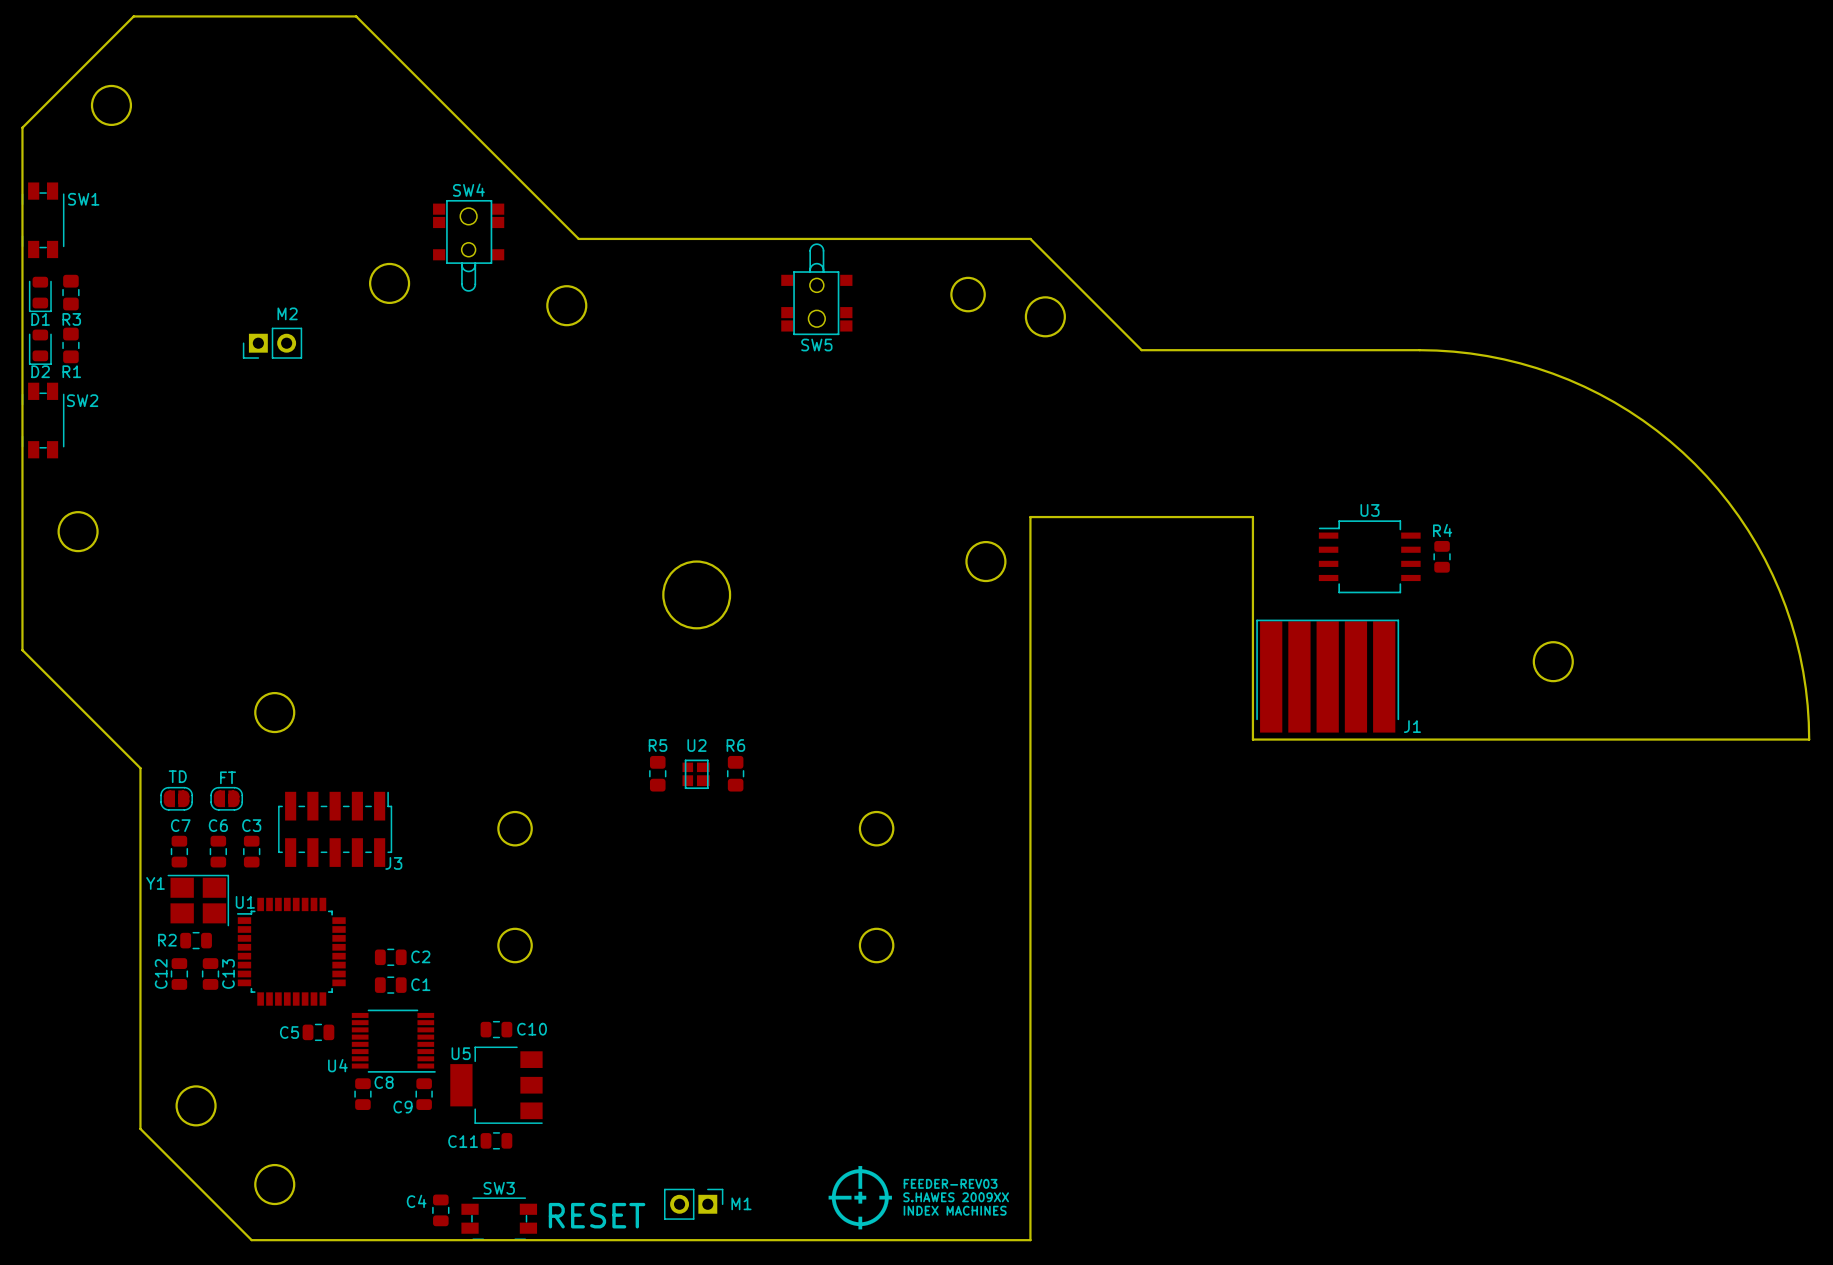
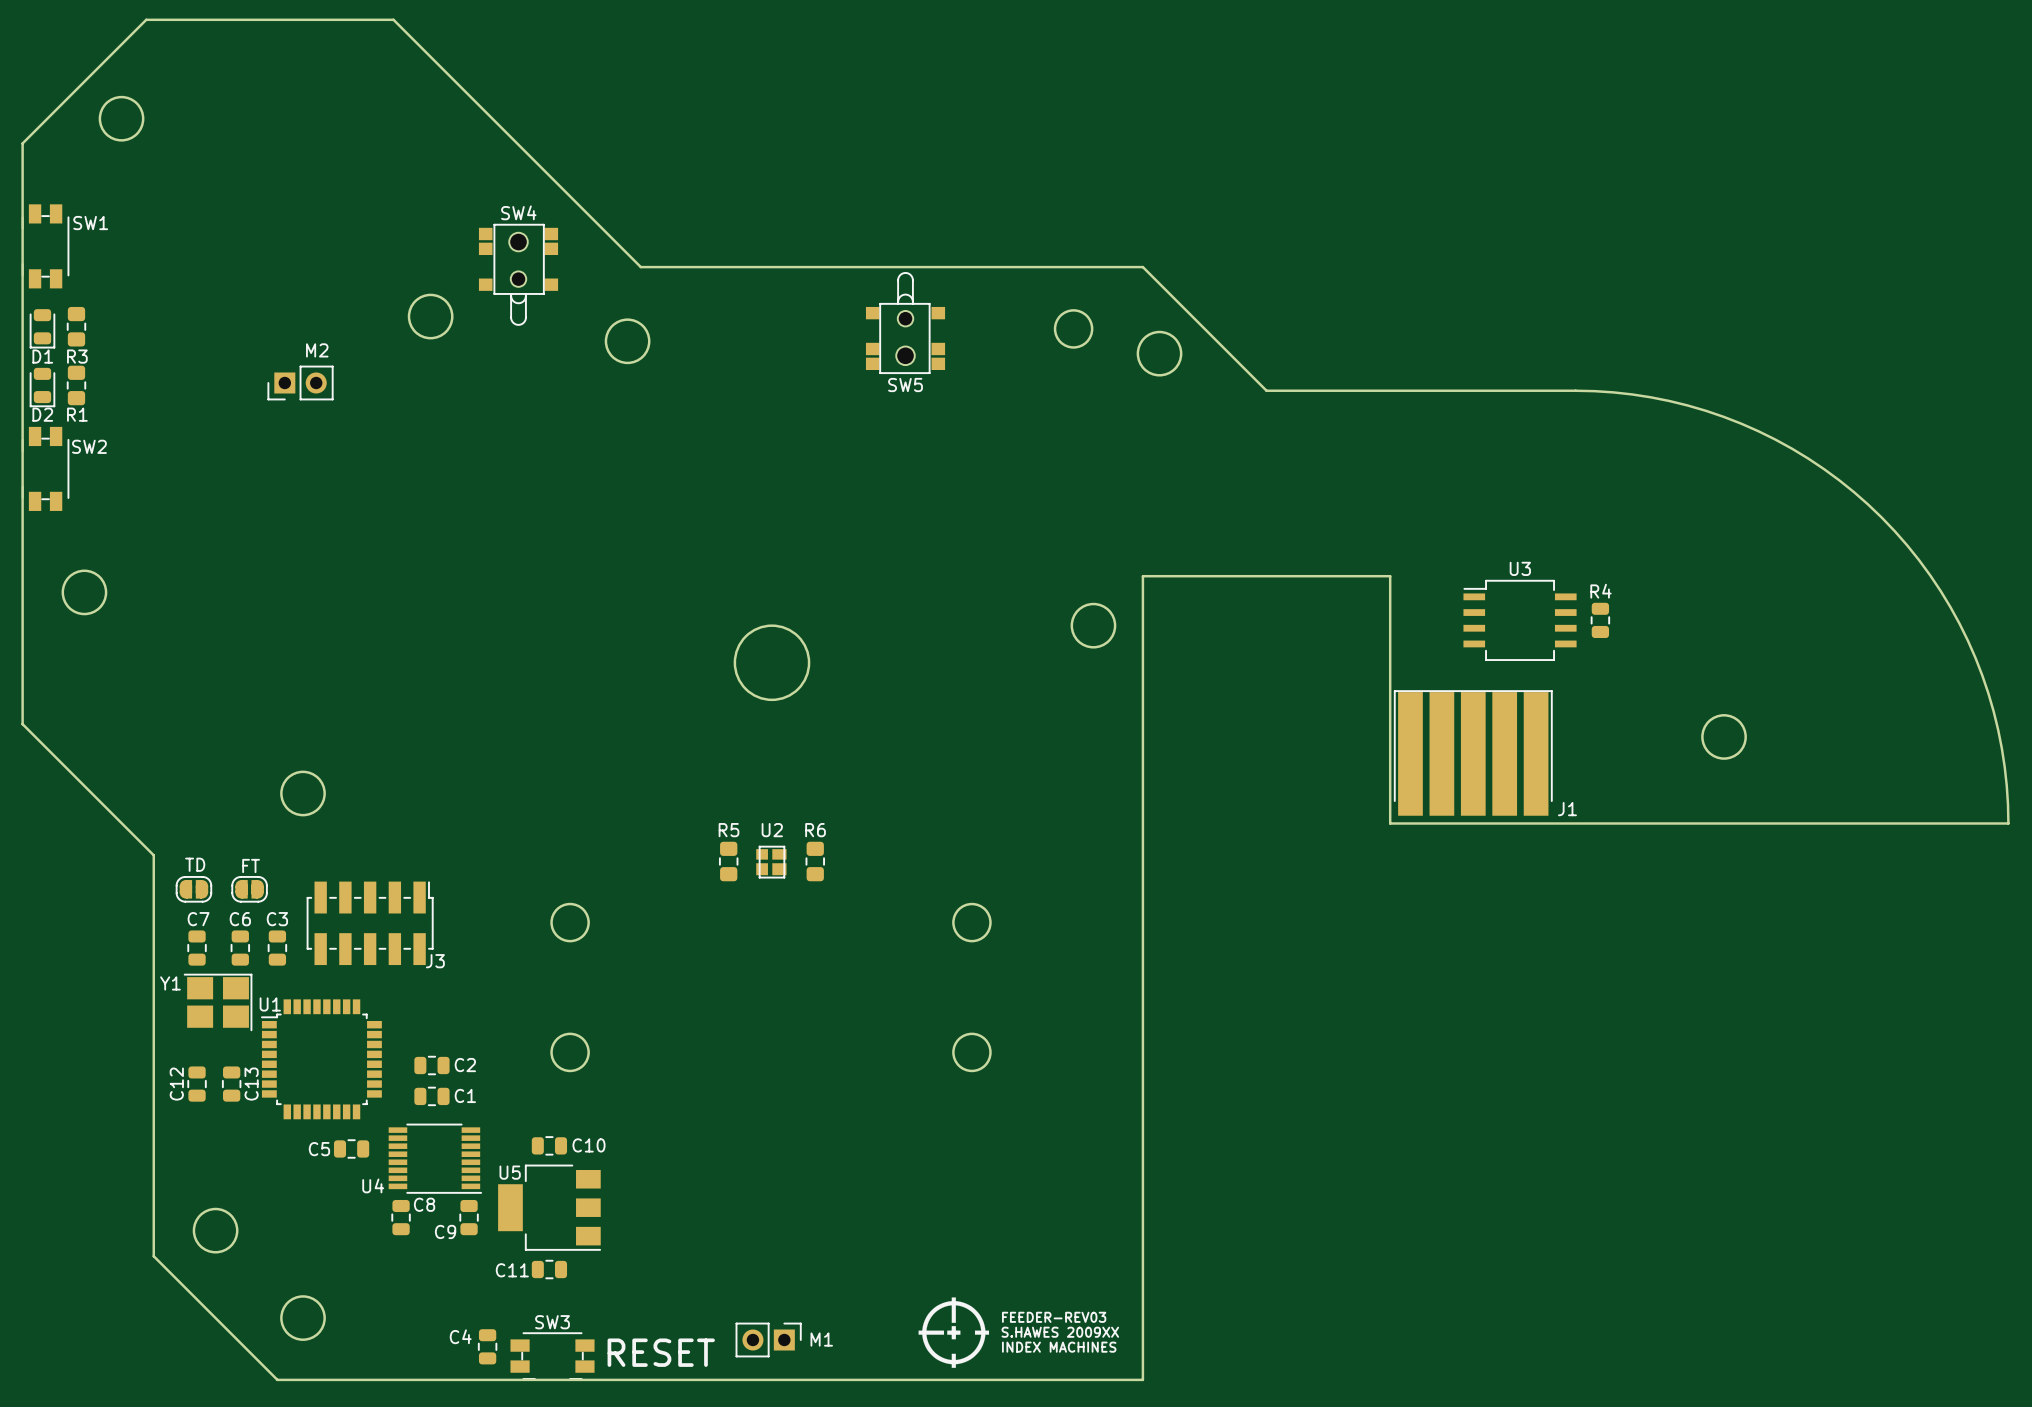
R2: (196, 940) -> none

